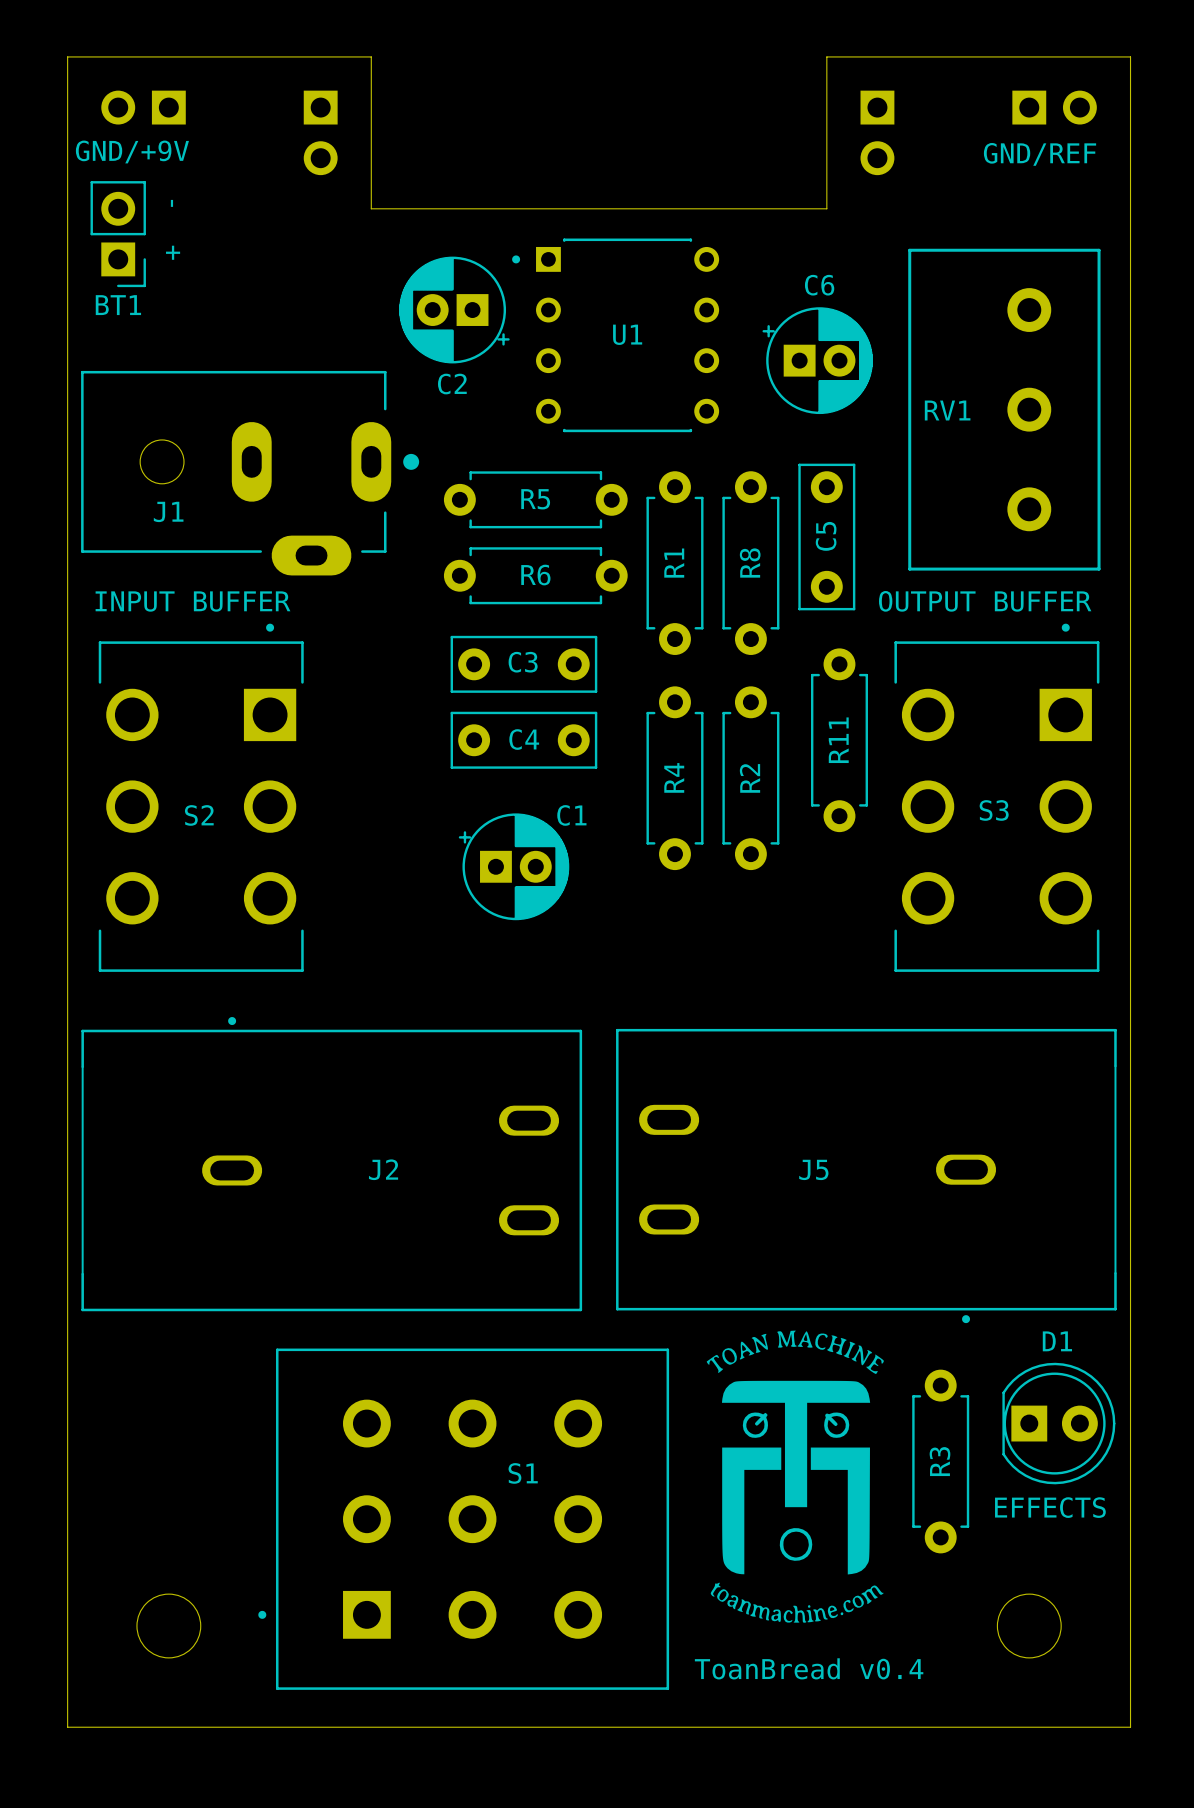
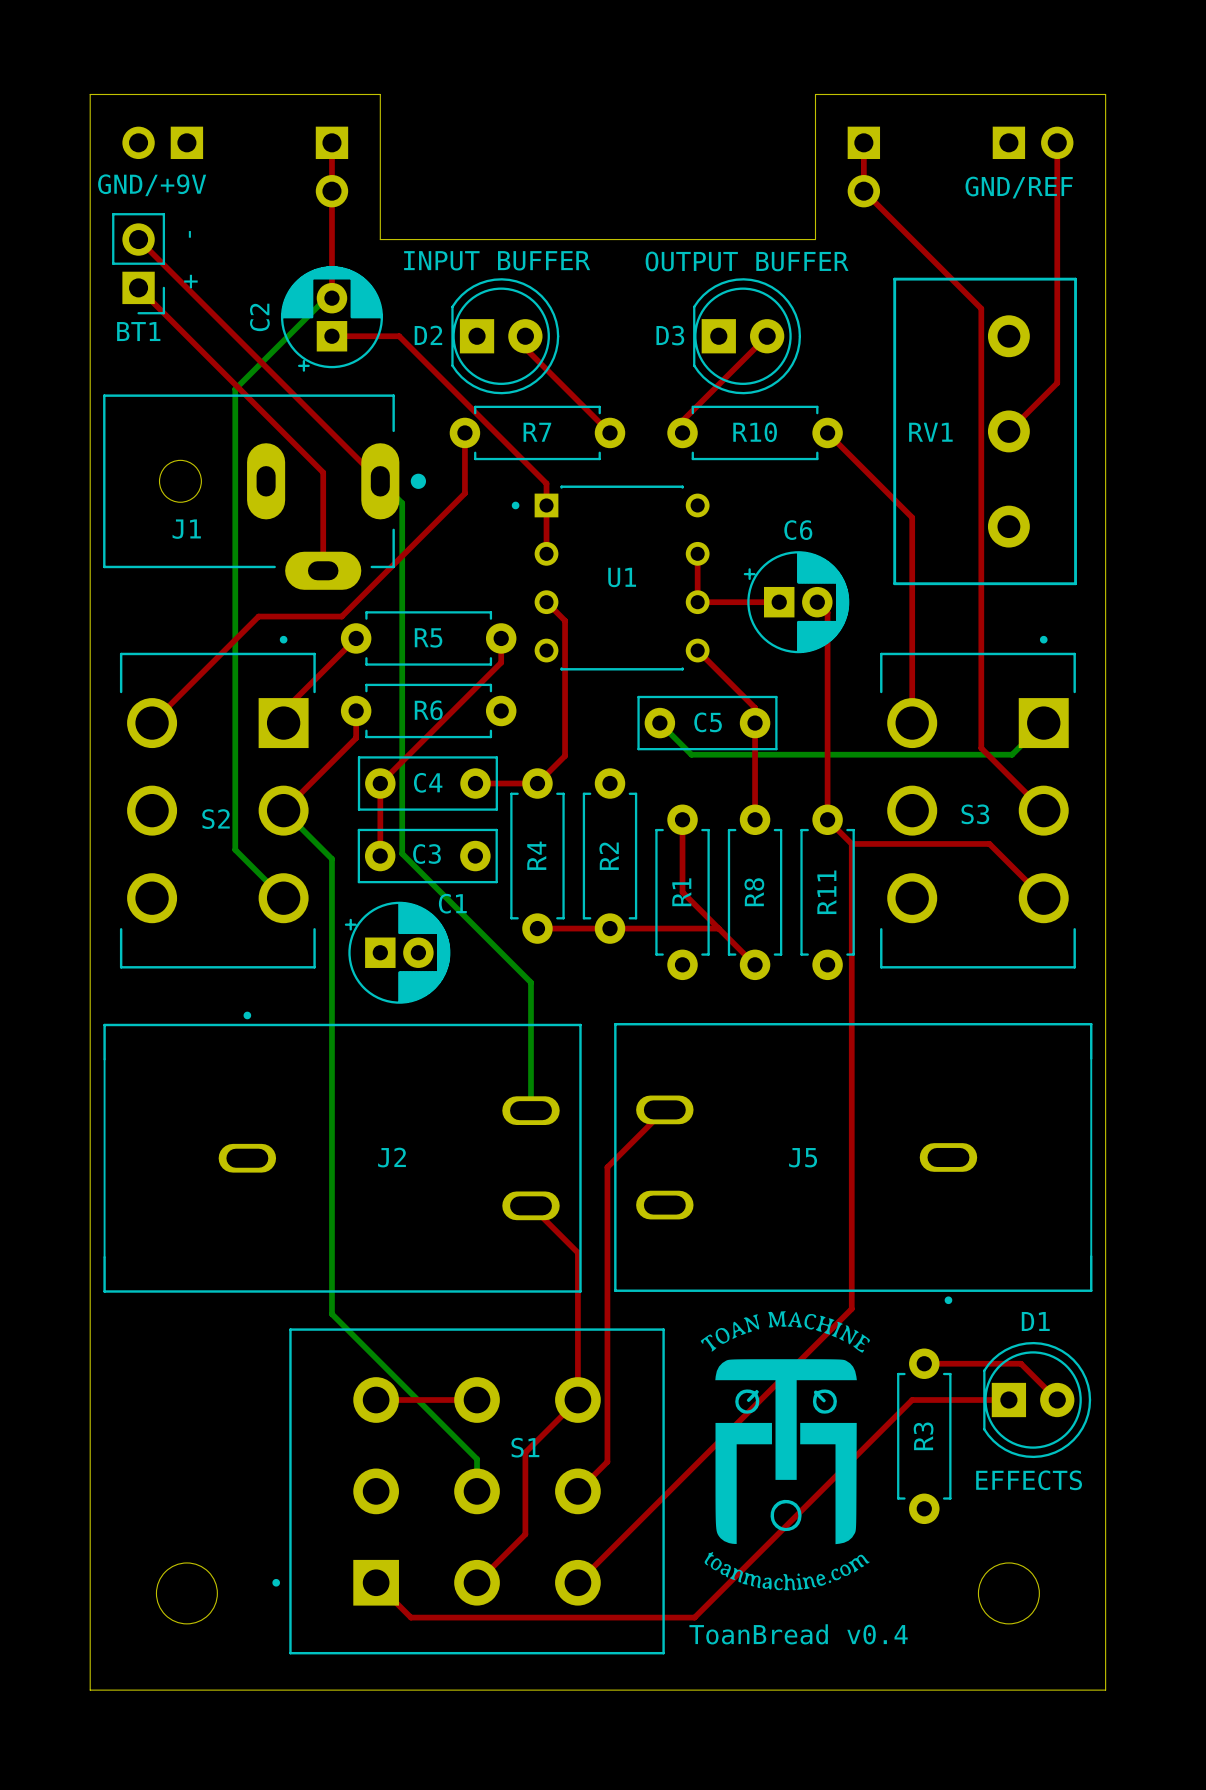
top track: none -> (331, 142) (331, 298)
top track: none -> (863, 142) (863, 191) (981, 308) (981, 748) (1043, 810)
top track: none -> (1057, 142) (1057, 383) (1008, 431)
top track: none -> (138, 239) (380, 481)
top track: none -> (138, 287) (323, 472) (323, 570)
bottom track: none -> (331, 298) (326, 298) (235, 389) (235, 849) (283, 898)
top track: none -> (331, 336) (399, 336) (546, 483) (546, 553)
C2 rotation: 0° (454, 310) -> 90° clockwise (331, 318)
C2 position: (454, 310) -> (331, 318)
D2: none -> (505, 336)
top track: none -> (525, 336) (525, 348) (610, 432)
D3: none -> (747, 336)
top track: none -> (767, 336) (682, 420) (682, 432)
U1 position: (615, 335) -> (610, 578)
C6 position: (817, 360) -> (796, 602)
top track: none -> (464, 432) (464, 493) (341, 616) (258, 616) (152, 723)
R7: none -> (537, 432)
R10: none -> (755, 432)
top track: none -> (827, 432) (912, 517) (912, 723)
bottom track: none -> (380, 481) (402, 503) (402, 853) (531, 982) (531, 1110)
R5 position: (535, 499) -> (428, 638)
top track: none -> (697, 553) (697, 602) (779, 602)
C5 rotation: 0° (826, 537) -> 90° clockwise (707, 723)
C5 position: (826, 537) -> (707, 723)
R1 position: (674, 563) -> (682, 892)
R8 position: (750, 563) -> (755, 892)
R6 position: (535, 575) -> (428, 710)
top track: none -> (546, 602) (565, 620) (565, 755) (537, 783) (475, 783)
top track: none -> (817, 602) (827, 612) (827, 819) (851, 843)
text position: INPUT BUFFER (193, 601) -> INPUT BUFFER (497, 260)
text position: OUTPUT BUFFER (985, 601) -> OUTPUT BUFFER (747, 261)
top track: none -> (356, 638) (283, 710) (283, 723)
top track: none -> (501, 638) (501, 662) (380, 783) (380, 855)
top track: none -> (697, 650) (755, 707) (755, 819)
C3 position: (523, 664) -> (427, 856)
top track: none -> (356, 710) (356, 738) (283, 810)
bottom track: none -> (659, 723) (691, 754) (1012, 754) (1043, 723)
C4 position: (523, 740) -> (427, 783)
R11 position: (839, 740) -> (827, 892)
R4 position: (674, 778) -> (537, 856)
R2 position: (750, 778) -> (610, 856)
bottom track: none -> (283, 810) (331, 858) (331, 1314) (477, 1459) (477, 1491)
top track: none -> (682, 819) (682, 892) (755, 964)
top track: none -> (851, 843) (851, 1308) (577, 1582)
top track: none -> (851, 843) (989, 843) (1043, 898)
C1 position: (514, 866) -> (397, 952)
top track: none -> (537, 928) (718, 928)
top track: none -> (664, 1109) (607, 1167) (607, 1461) (577, 1491)
top track: none -> (531, 1205) (577, 1252) (577, 1400) (525, 1452) (525, 1534) (477, 1582)
top track: none -> (924, 1363) (1020, 1363) (1057, 1400)
top track: none -> (376, 1400) (477, 1400)
top track: none -> (1008, 1400) (912, 1400) (694, 1617) (410, 1617) (376, 1582)

